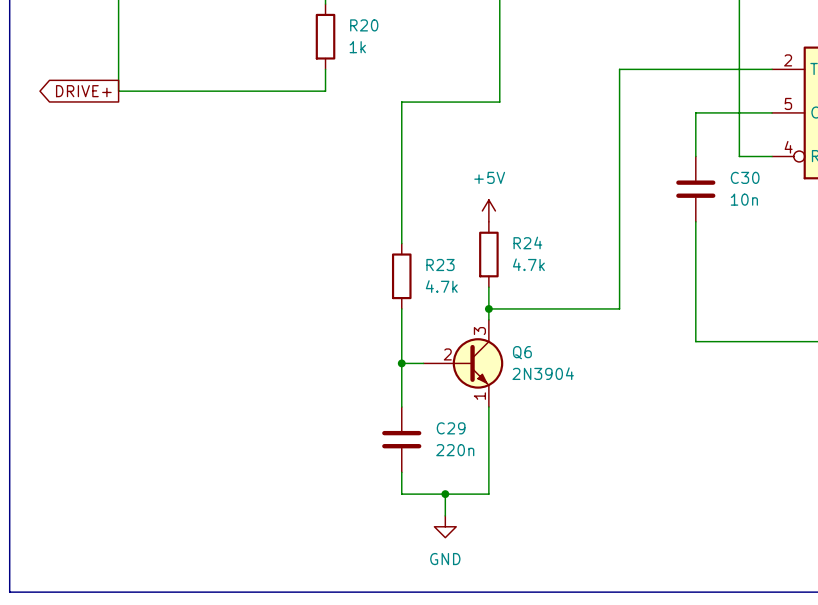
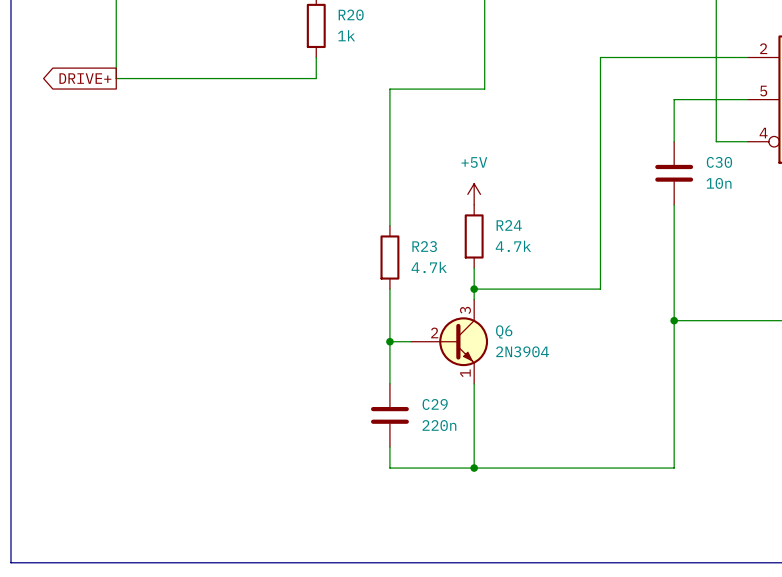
wire: none -> (674, 320) (674, 468) (474, 468)
junction: none -> (674, 320)
wire: (445, 494) (445, 515) -> none
junction position: (445, 494) -> (474, 468)
power symbol: GND (445, 526) -> none

